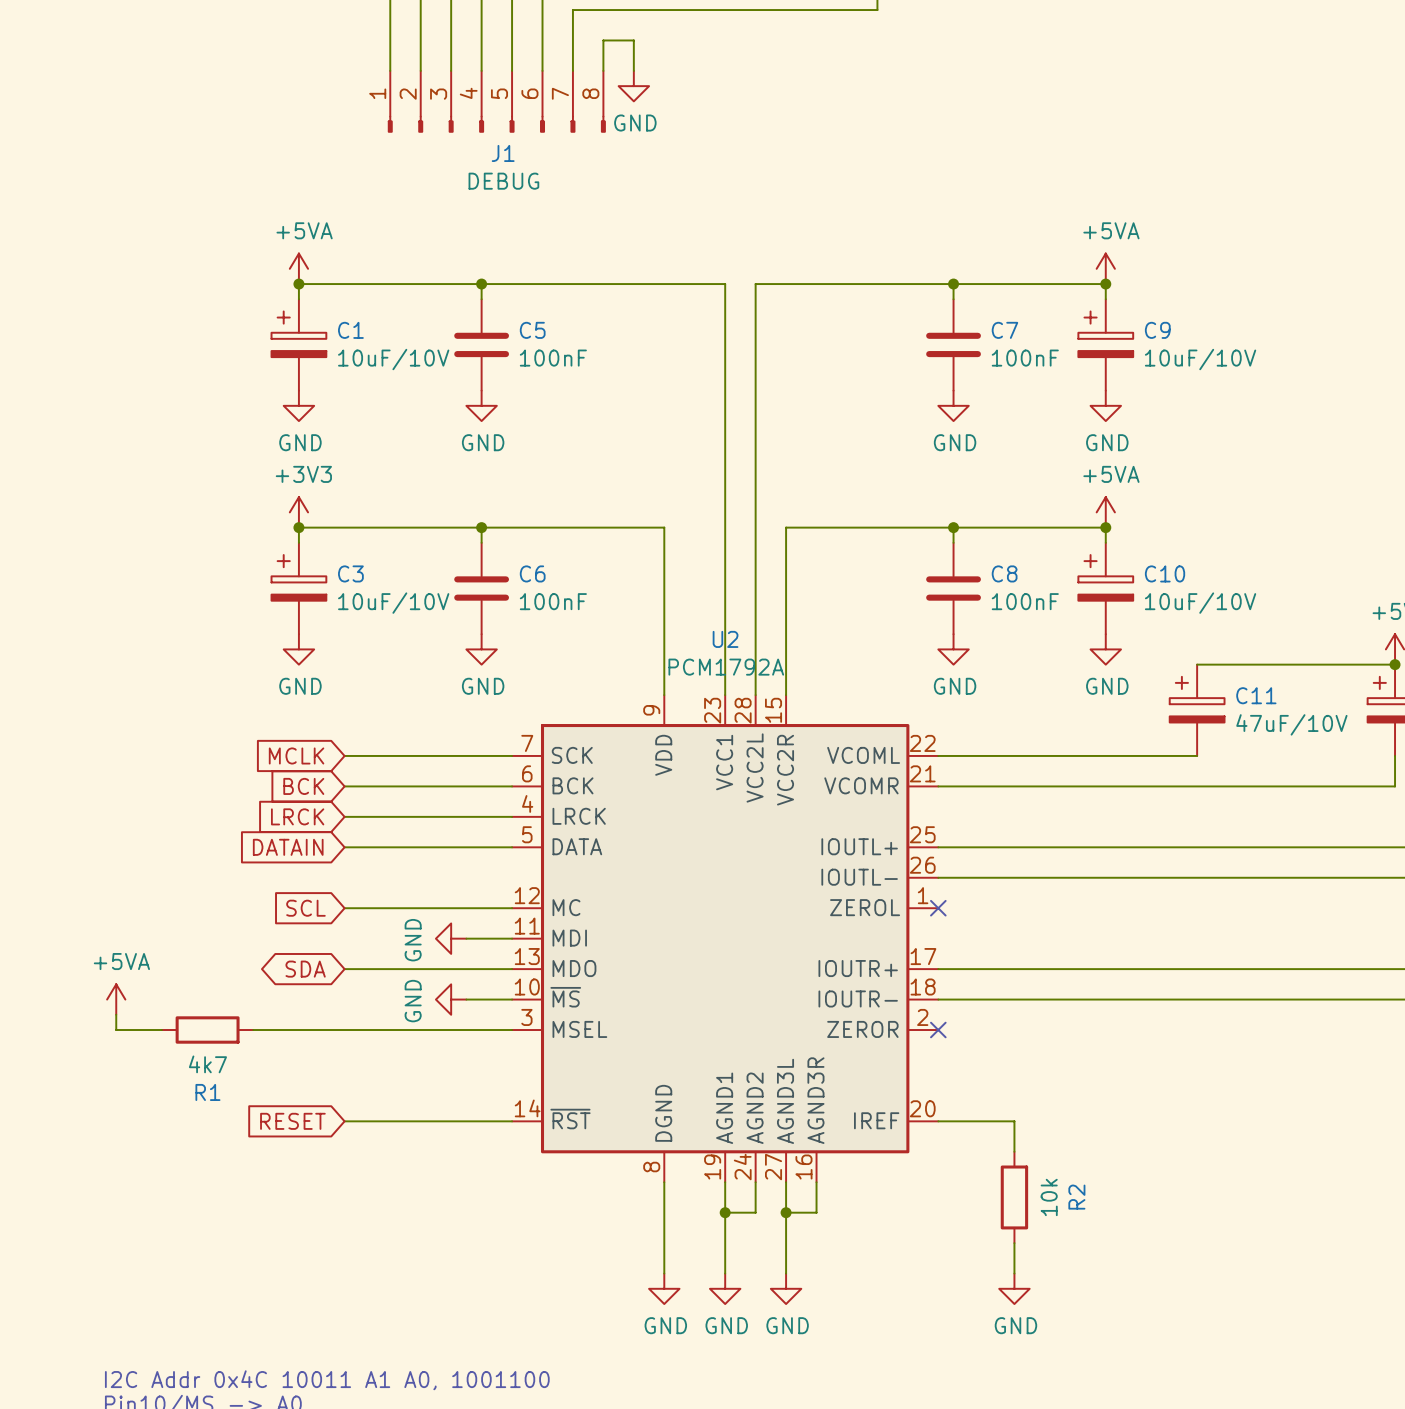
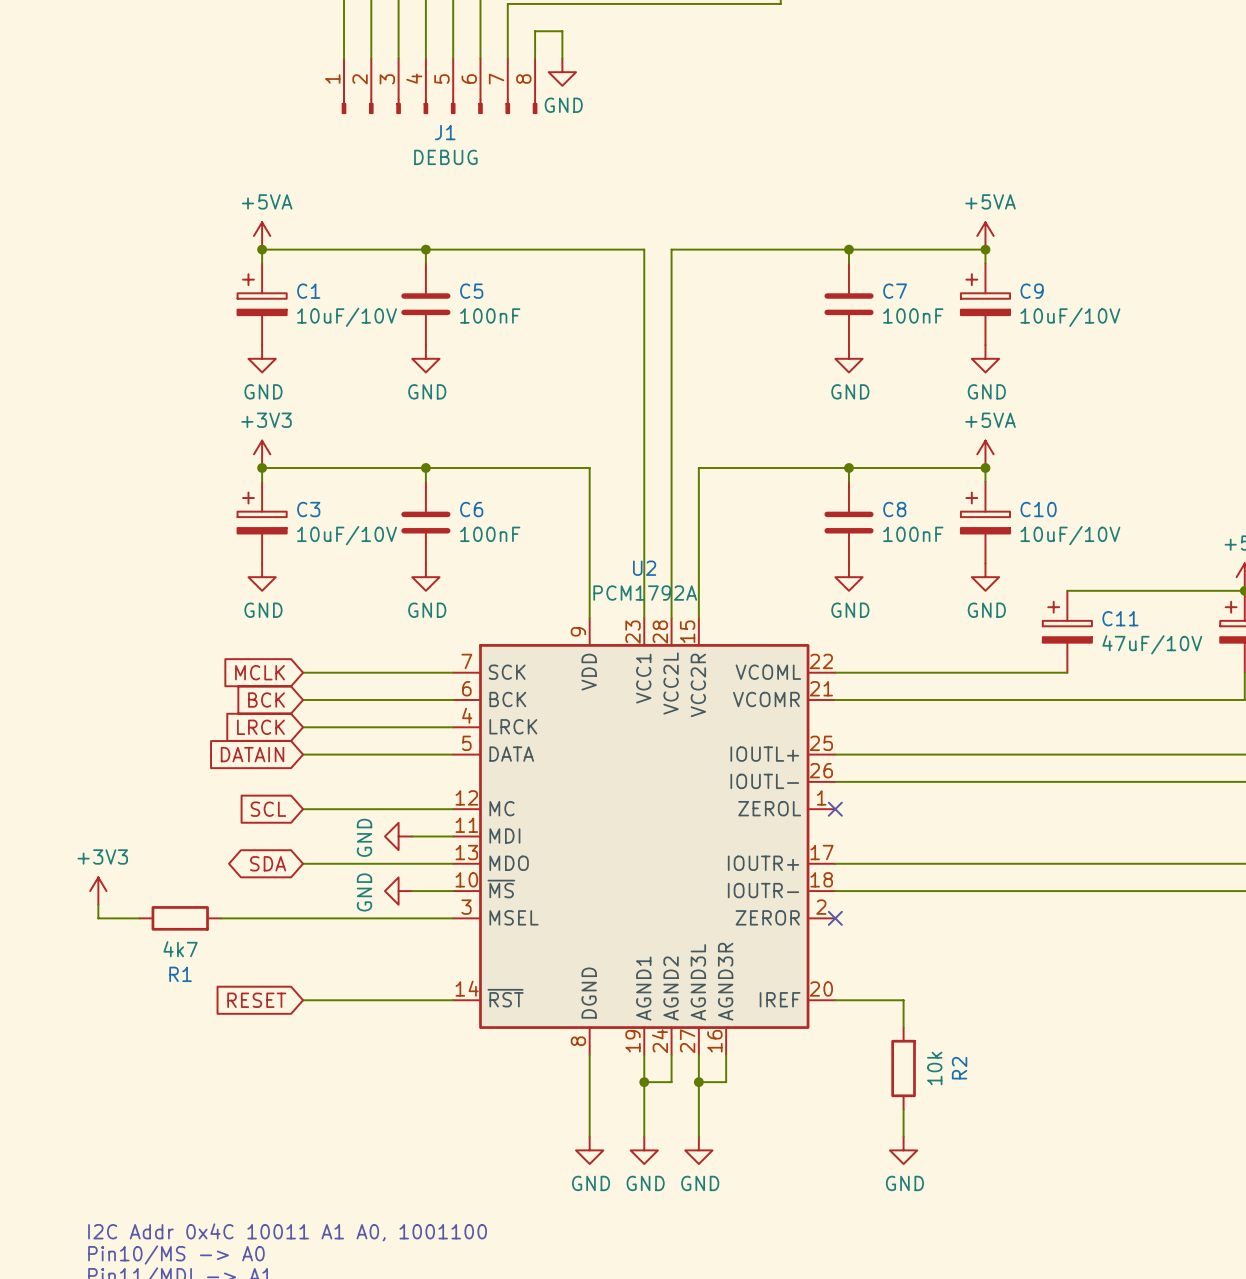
power symbol: +5VA (116, 999) -> +3V3 (98, 891)

